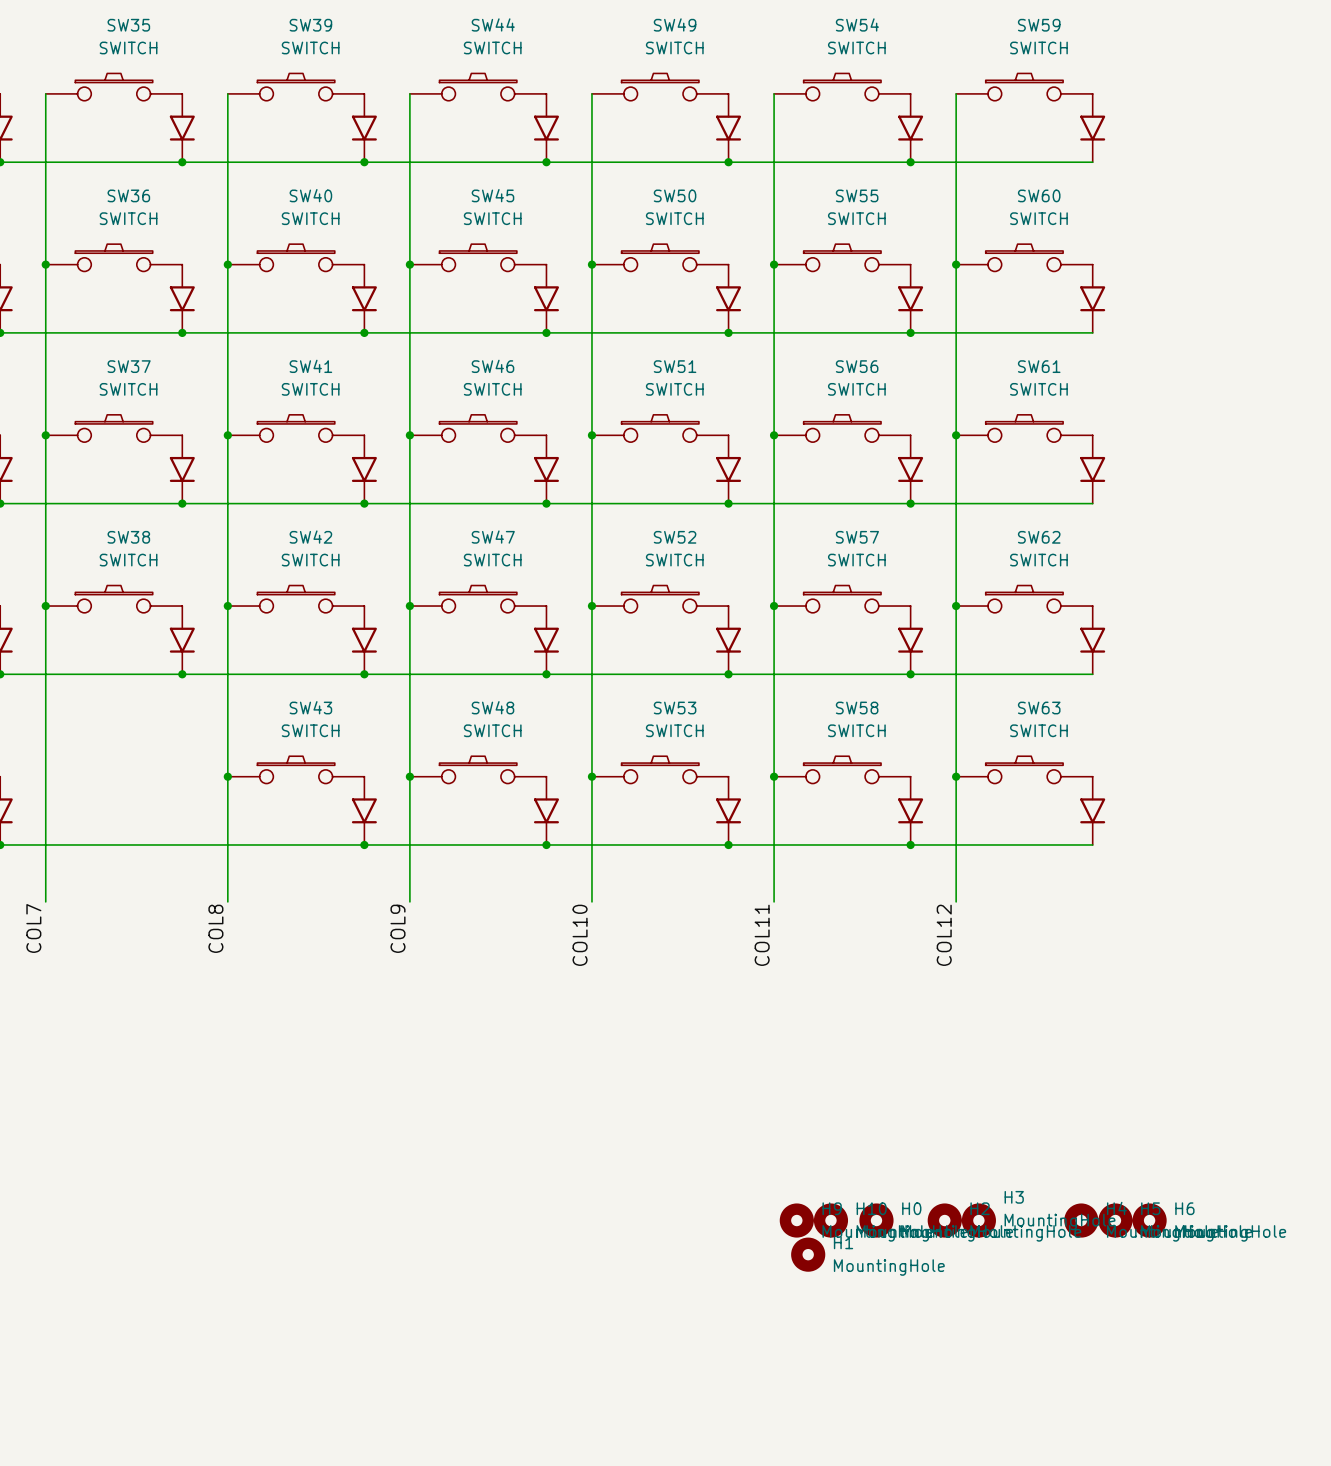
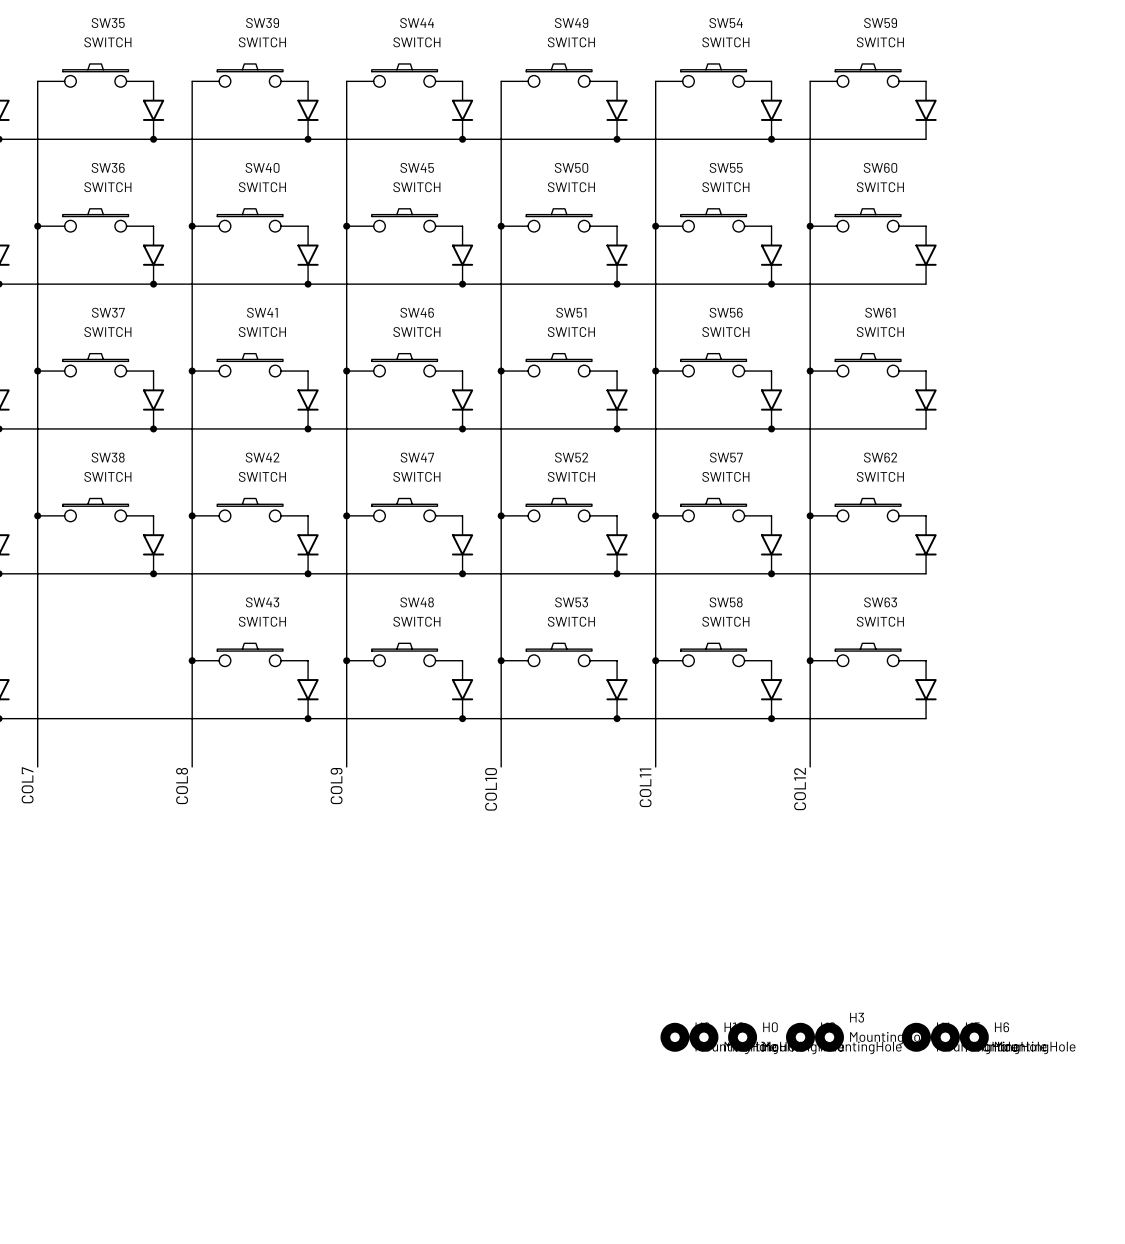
H1: MountingHole (808, 1254) -> none

